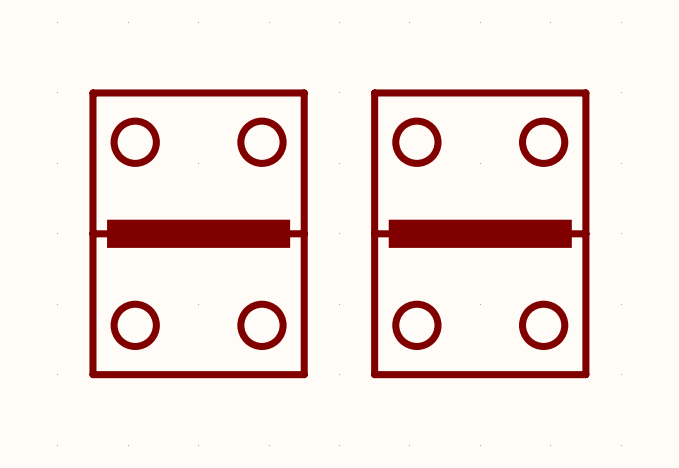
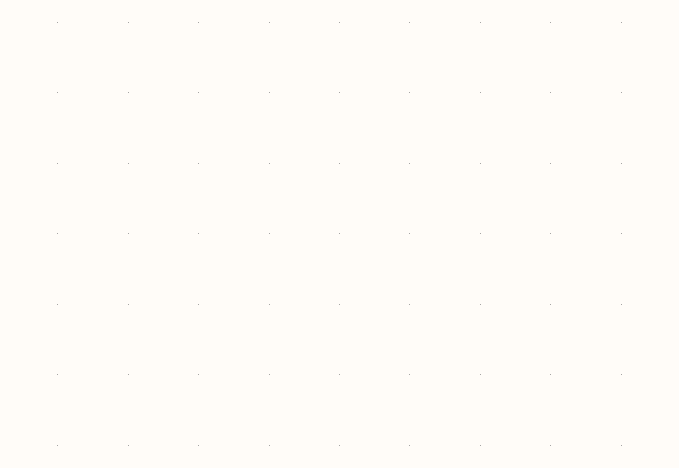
part: (198, 233) -> none
part: (480, 233) -> none

